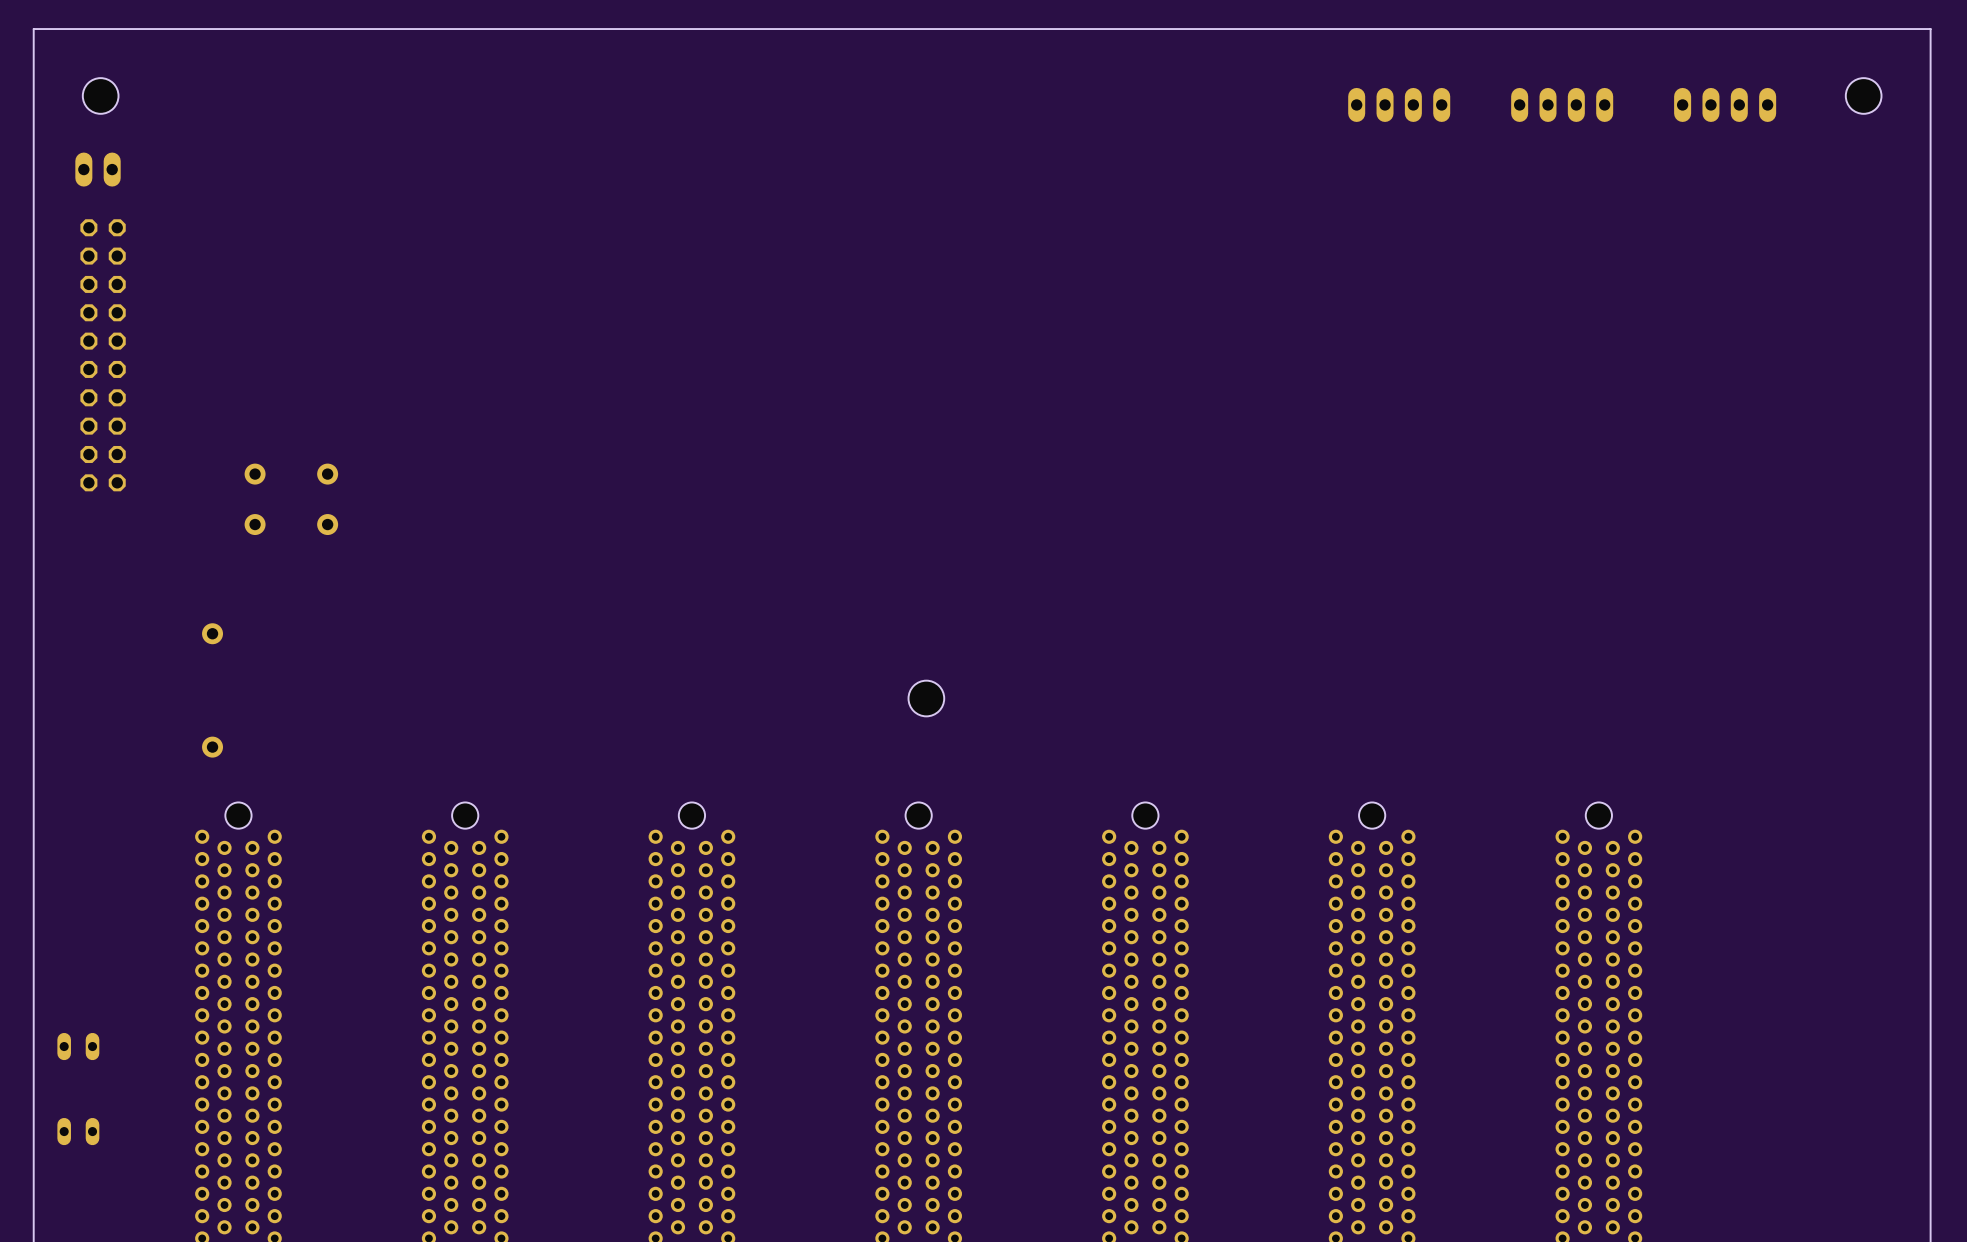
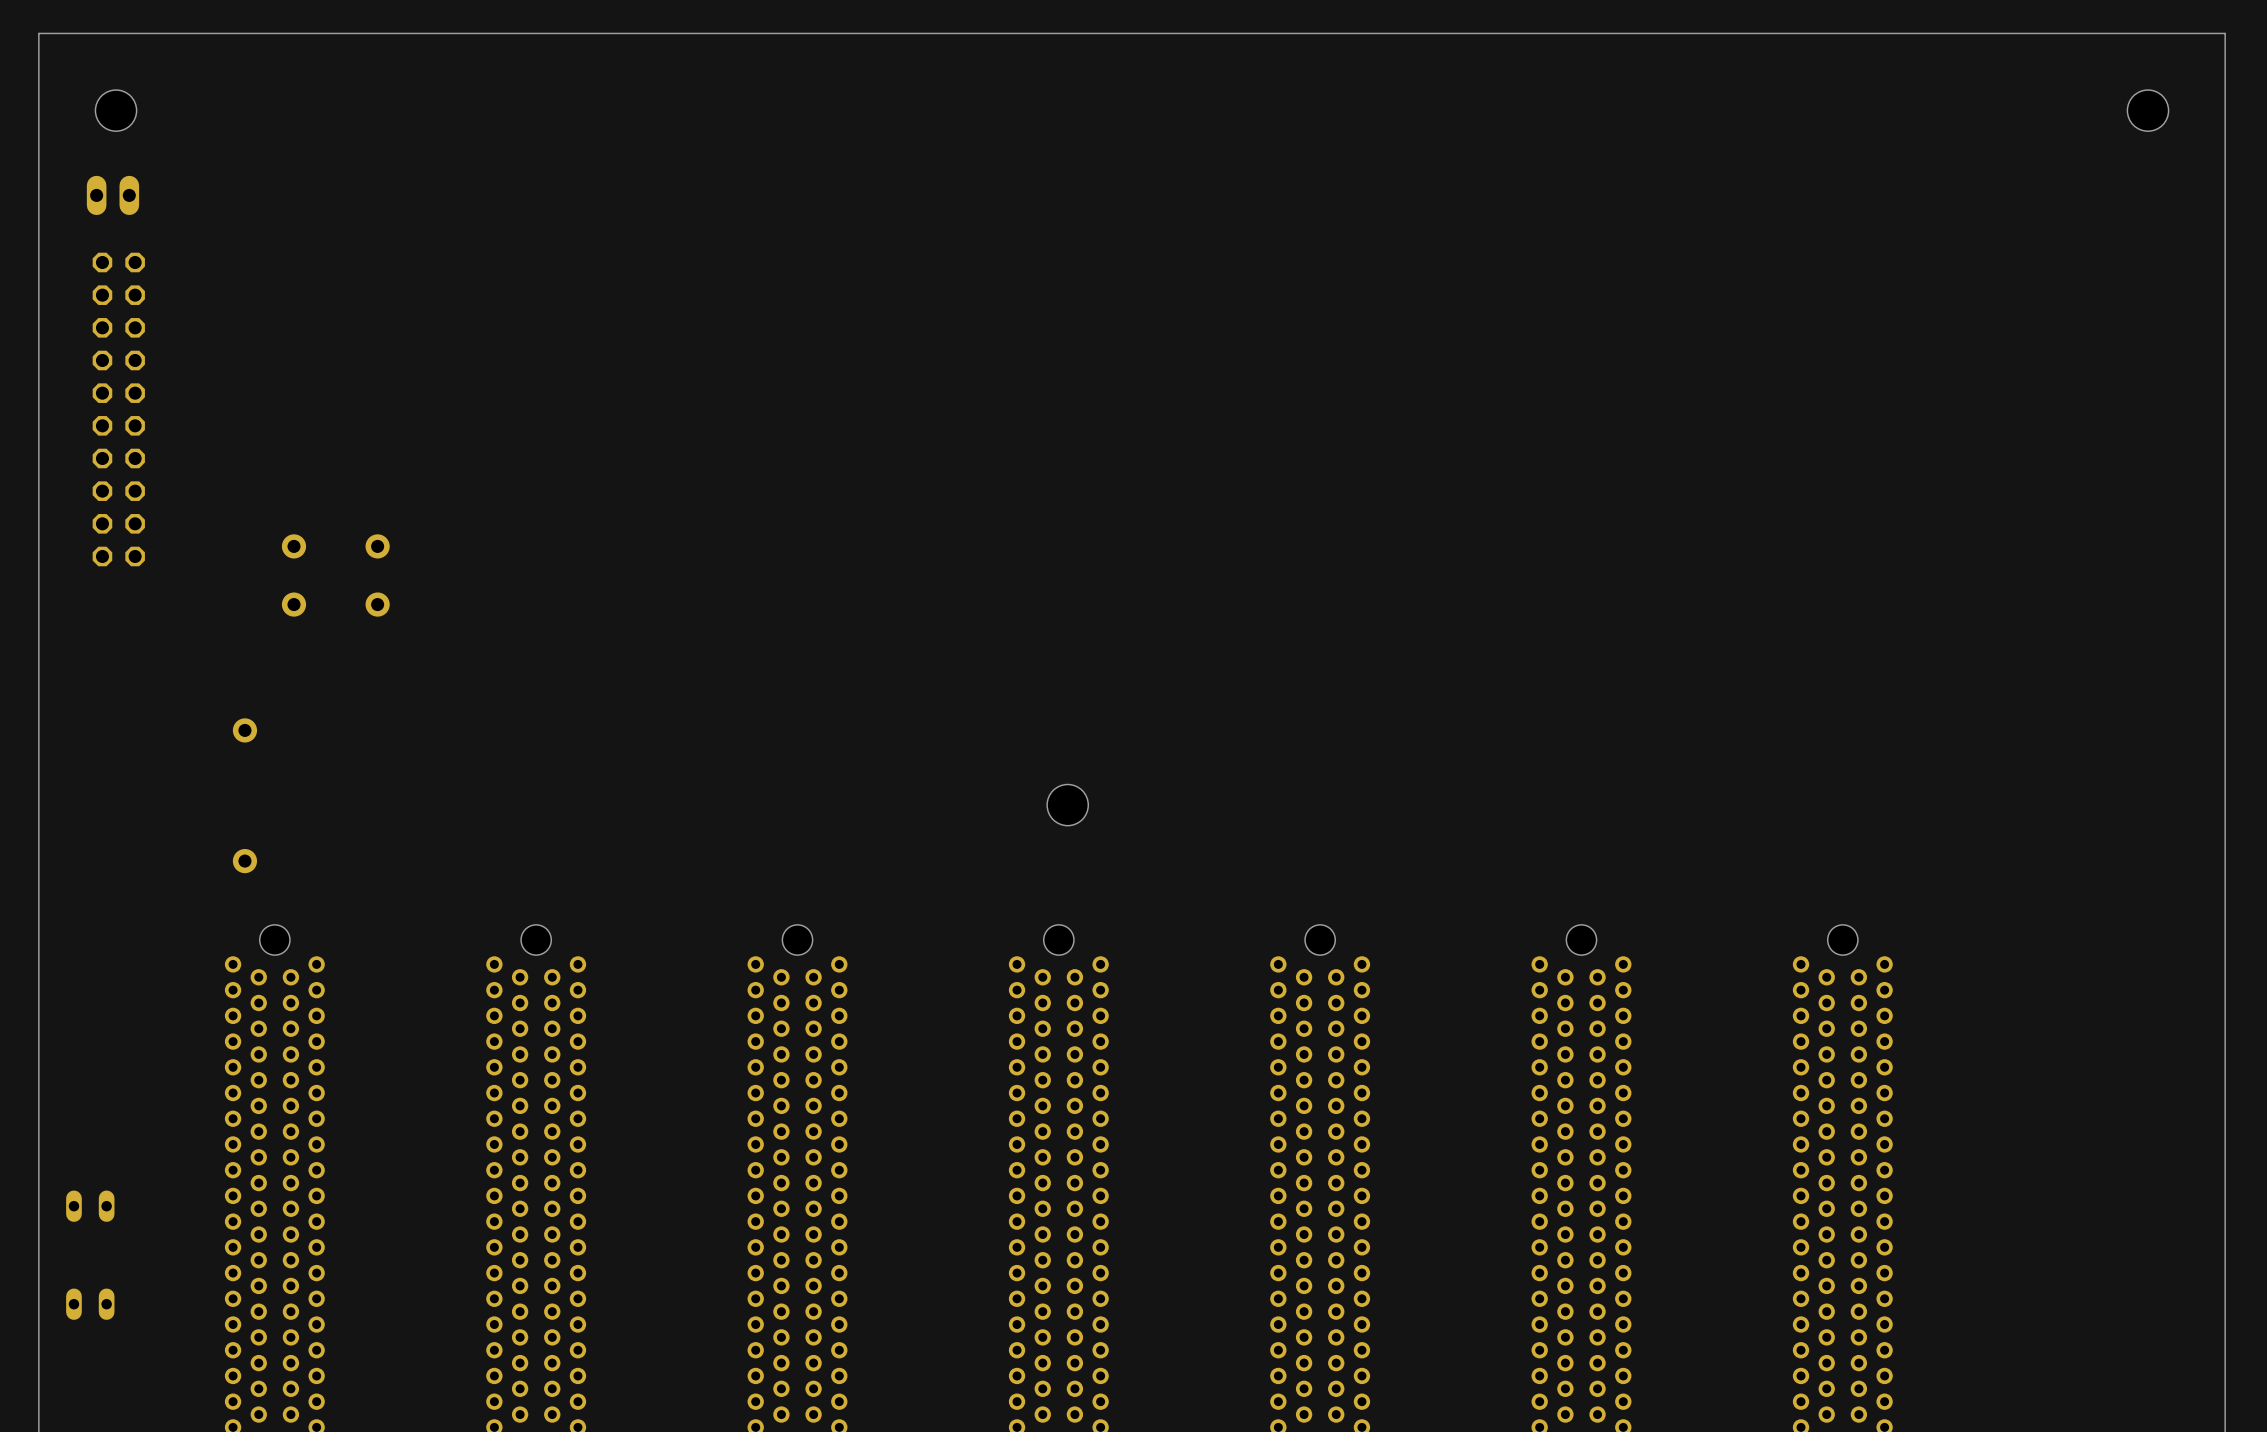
part: (1399, 104) -> none
part: (1562, 104) -> none
part: (1725, 104) -> none

